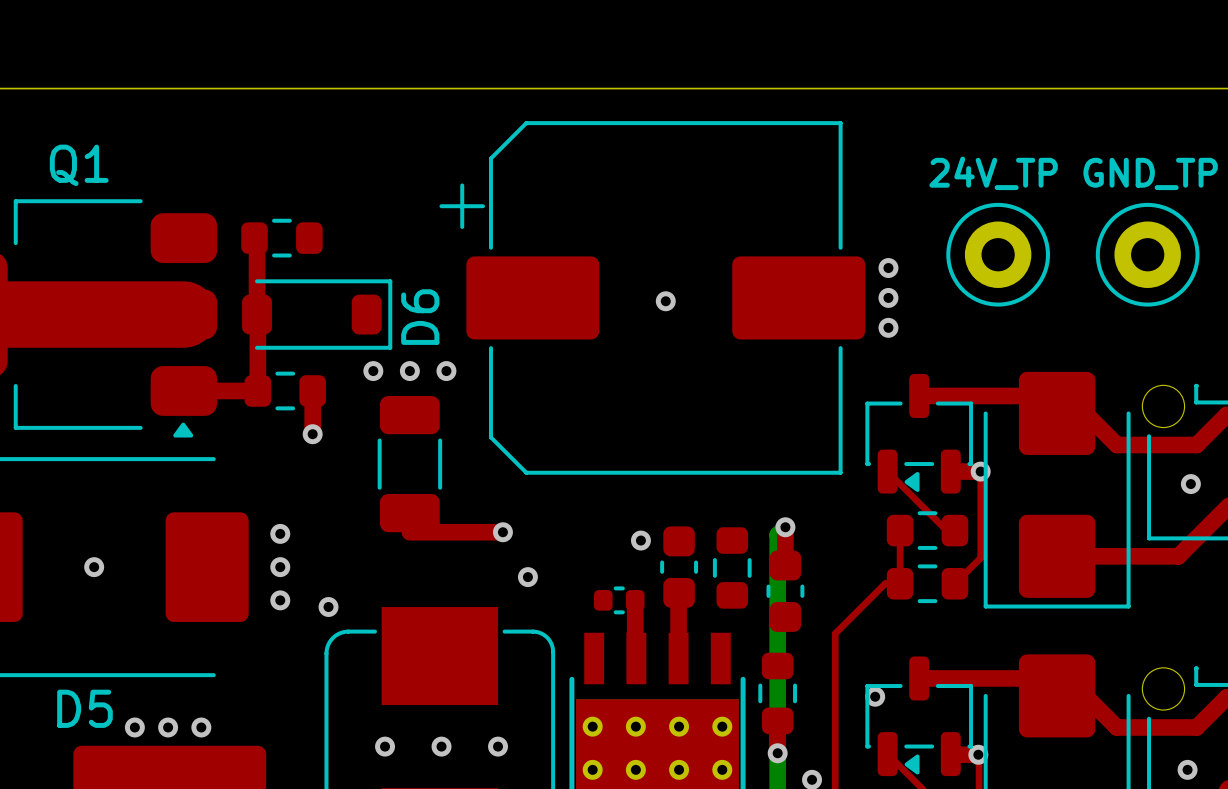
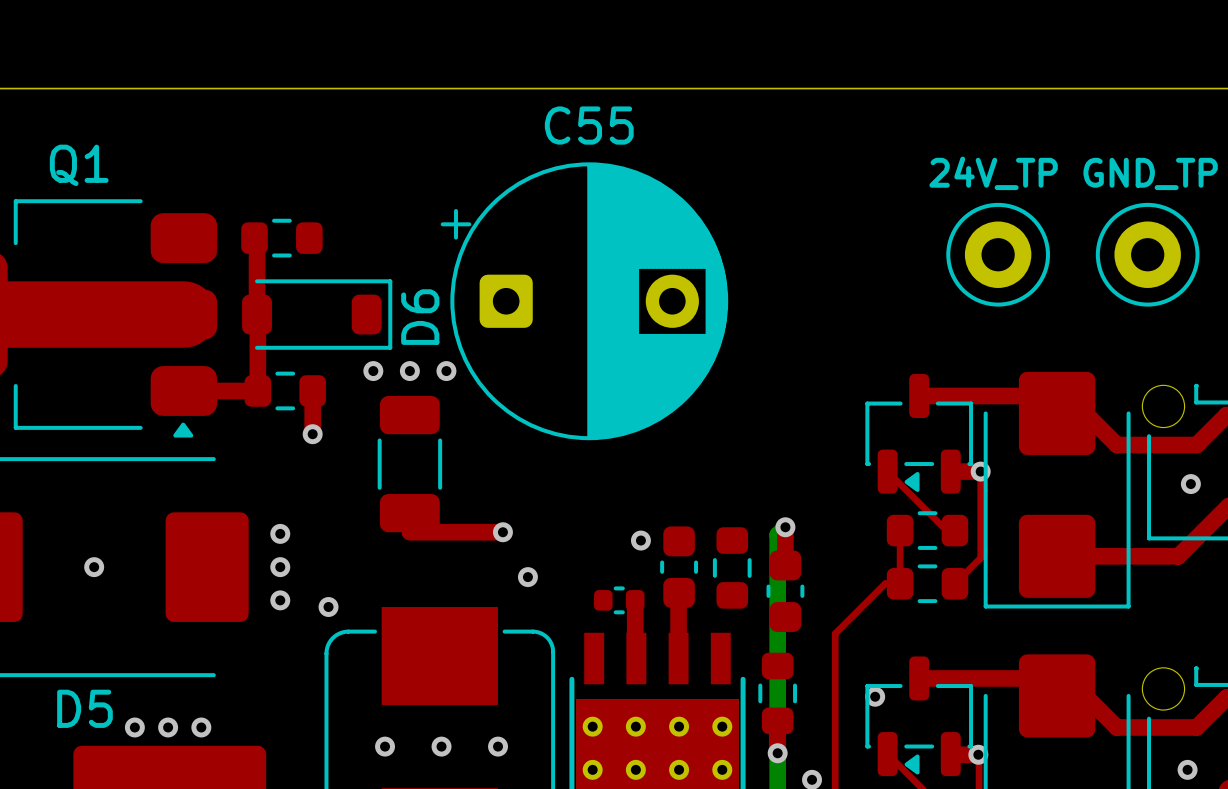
via: (888, 268) -> none
part: (652, 297) -> none
via: (888, 297) -> none
C55: none -> (584, 301)
via: (665, 301) -> none
via: (888, 327) -> none

